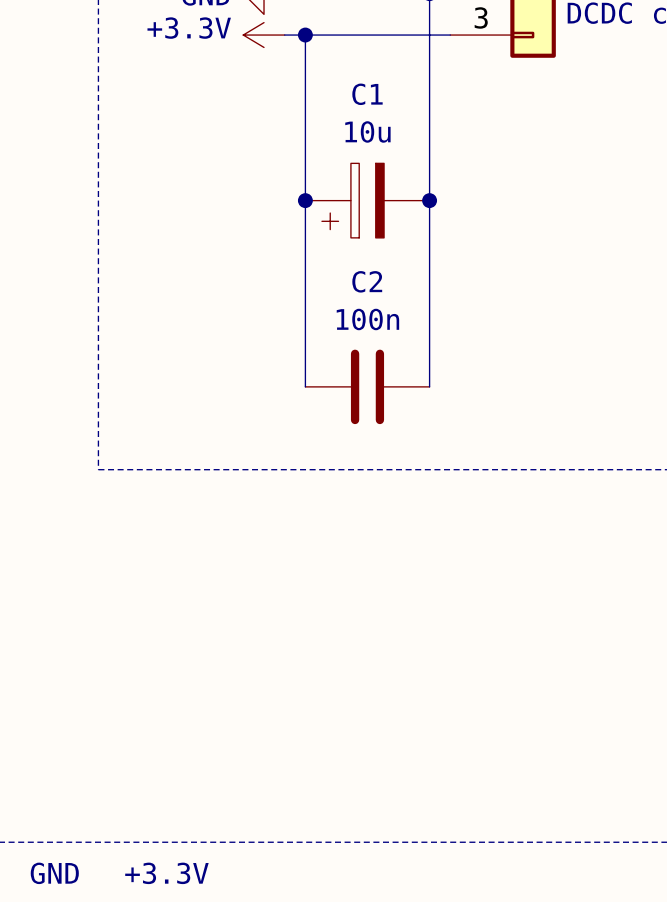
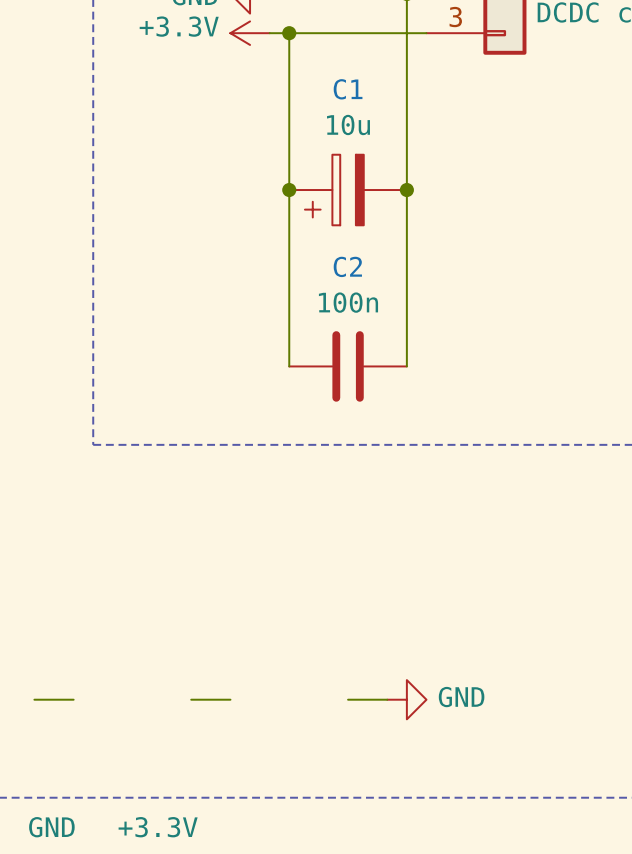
wire: none -> (34, 699) (73, 699)
wire: none -> (191, 699) (230, 699)
wire: none -> (348, 699) (387, 699)
power symbol: none -> GND (406, 699)

